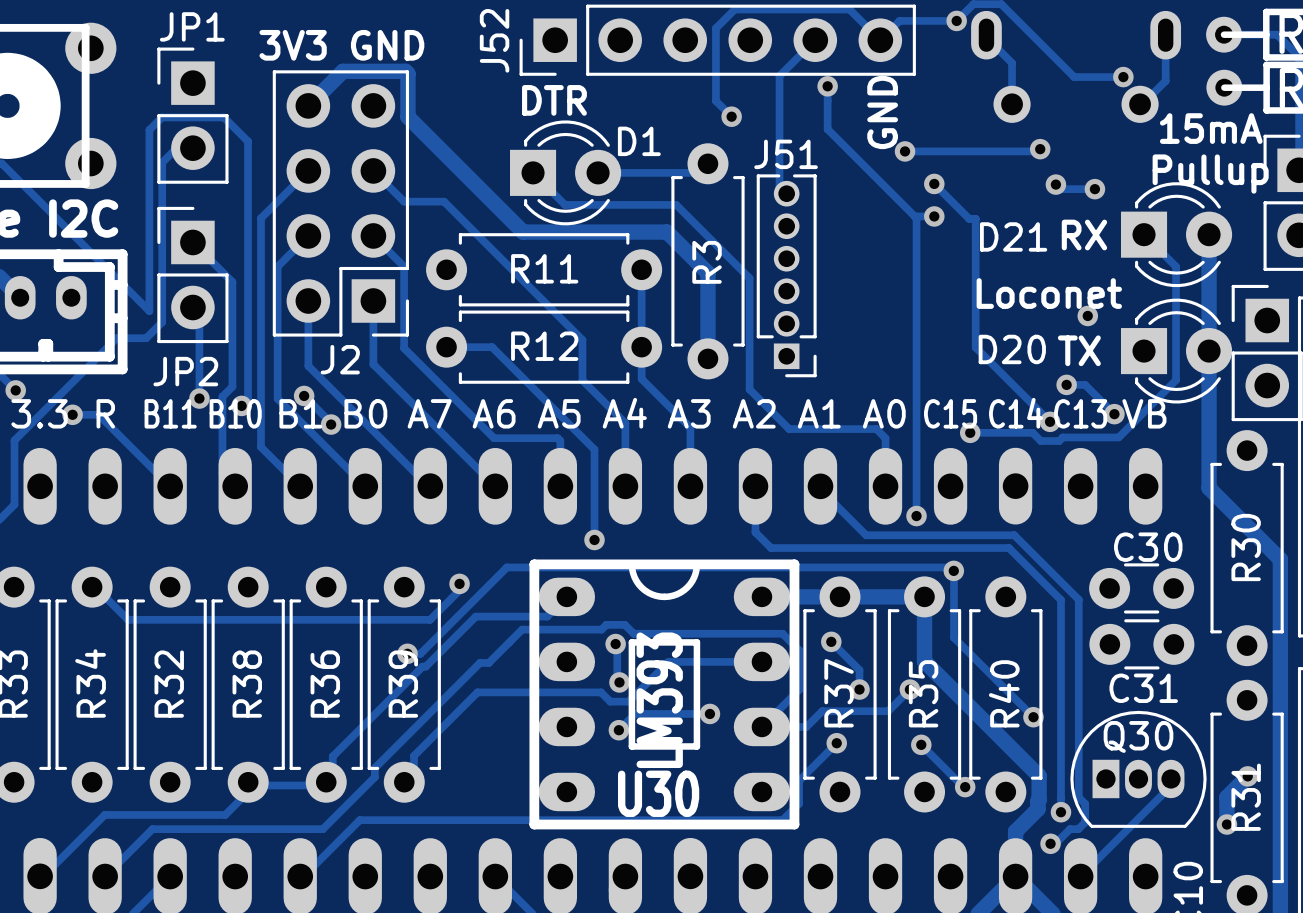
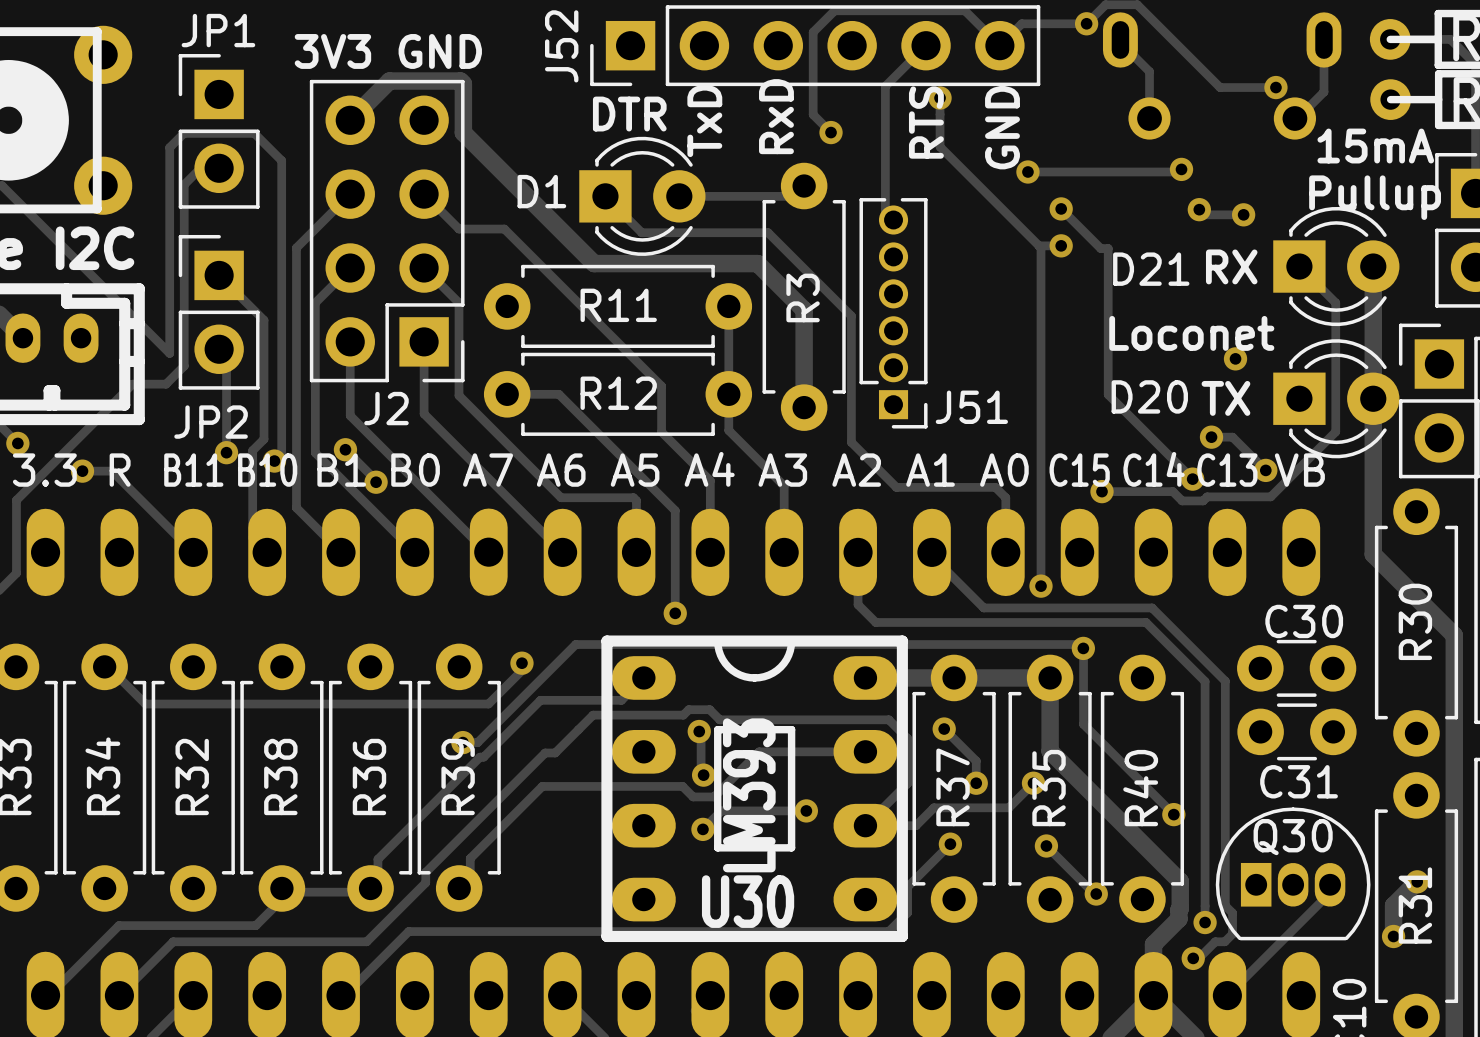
text: none -> RxD (776, 116)
text: none -> TxD (704, 120)
text: none -> RTS (926, 122)
D1 name position: D1 (639, 141) -> D1 (541, 191)
J51 name position: J51 (786, 154) -> J51 (971, 407)

